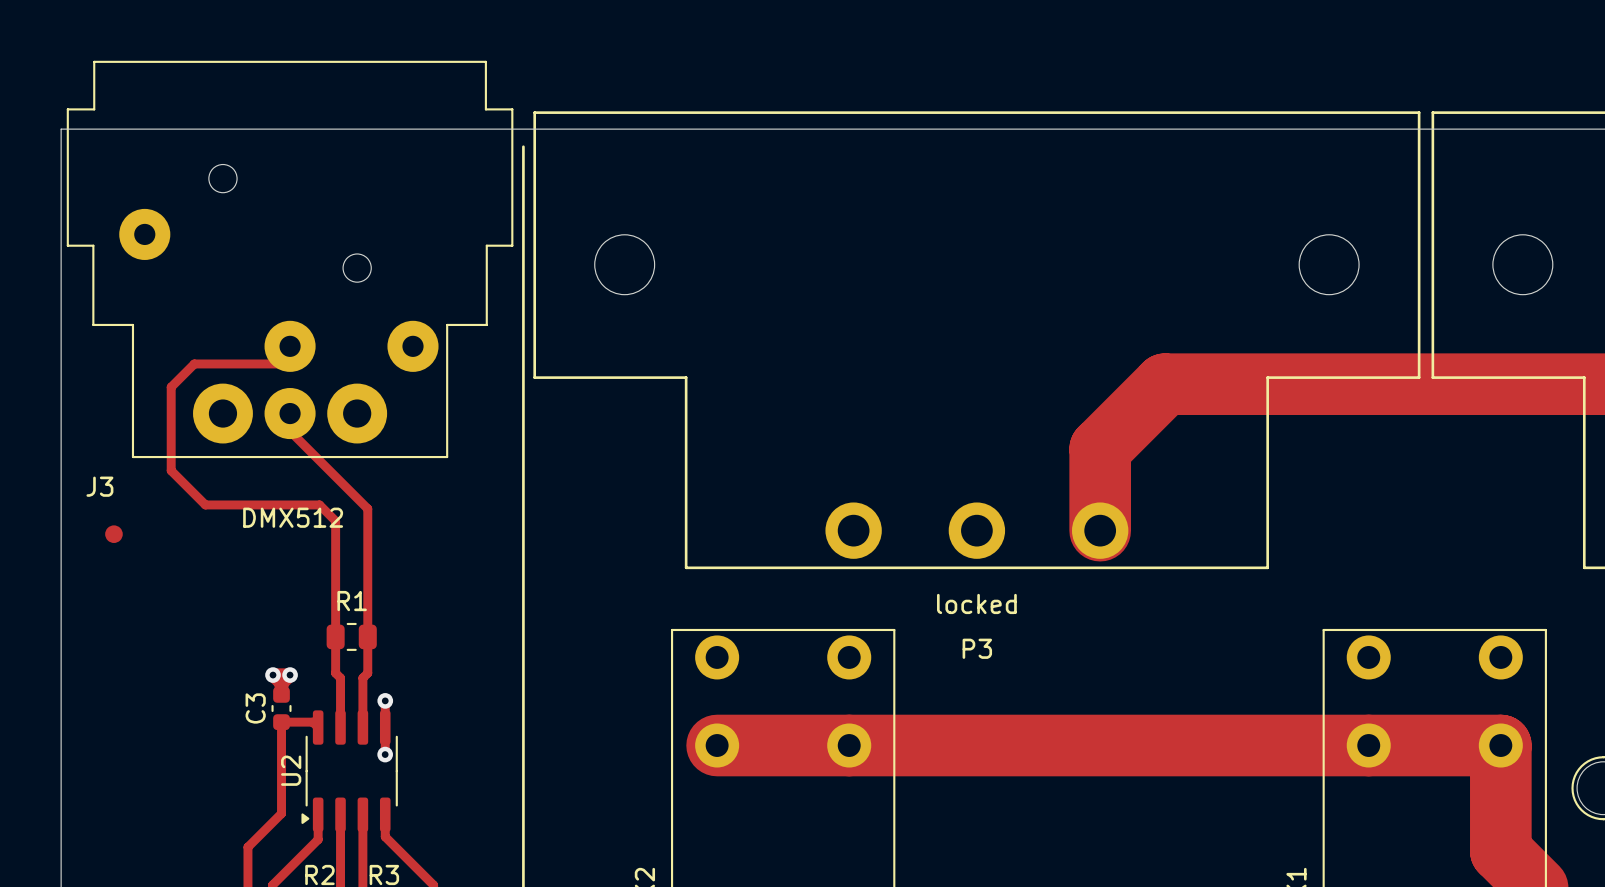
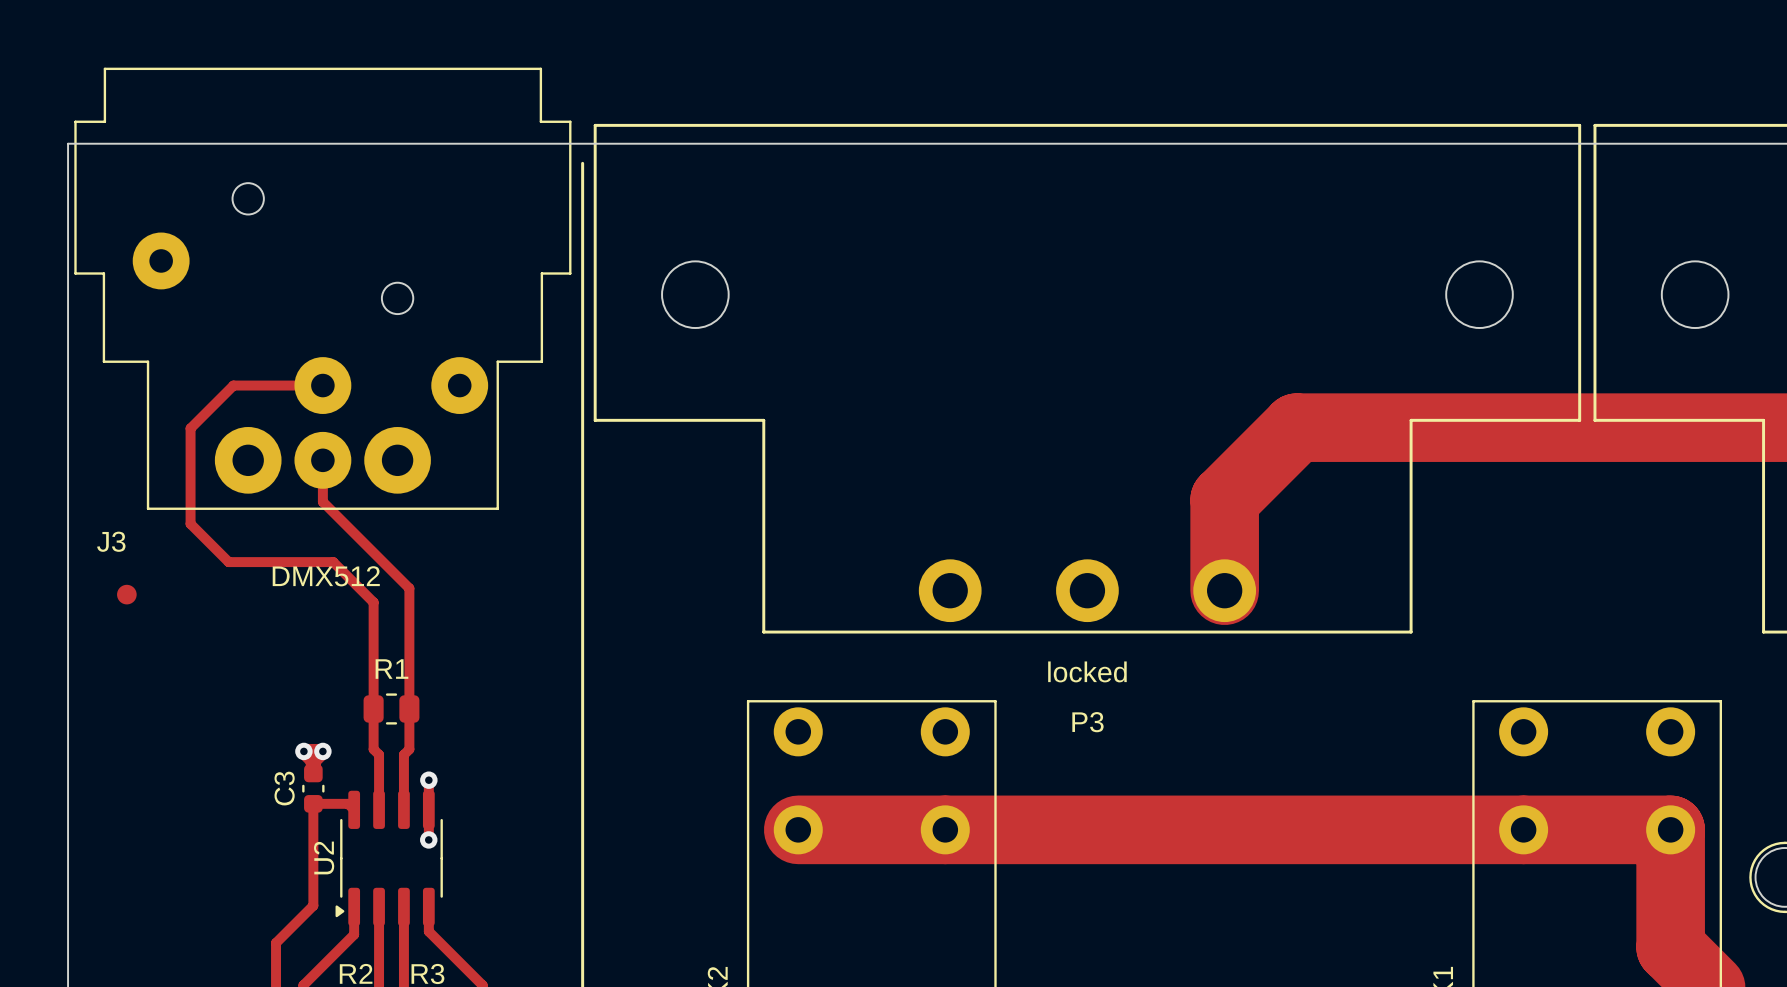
track: (290, 363) (194, 363) (171, 387) -> (322, 385) (233, 385) (190, 428) (190, 430)
track: (290, 431) (367, 508) (367, 528) -> (322, 479) (322, 501) (409, 588)
track: (299, 504) (319, 504) (335, 521) (335, 541) -> (333, 562) (373, 602)

